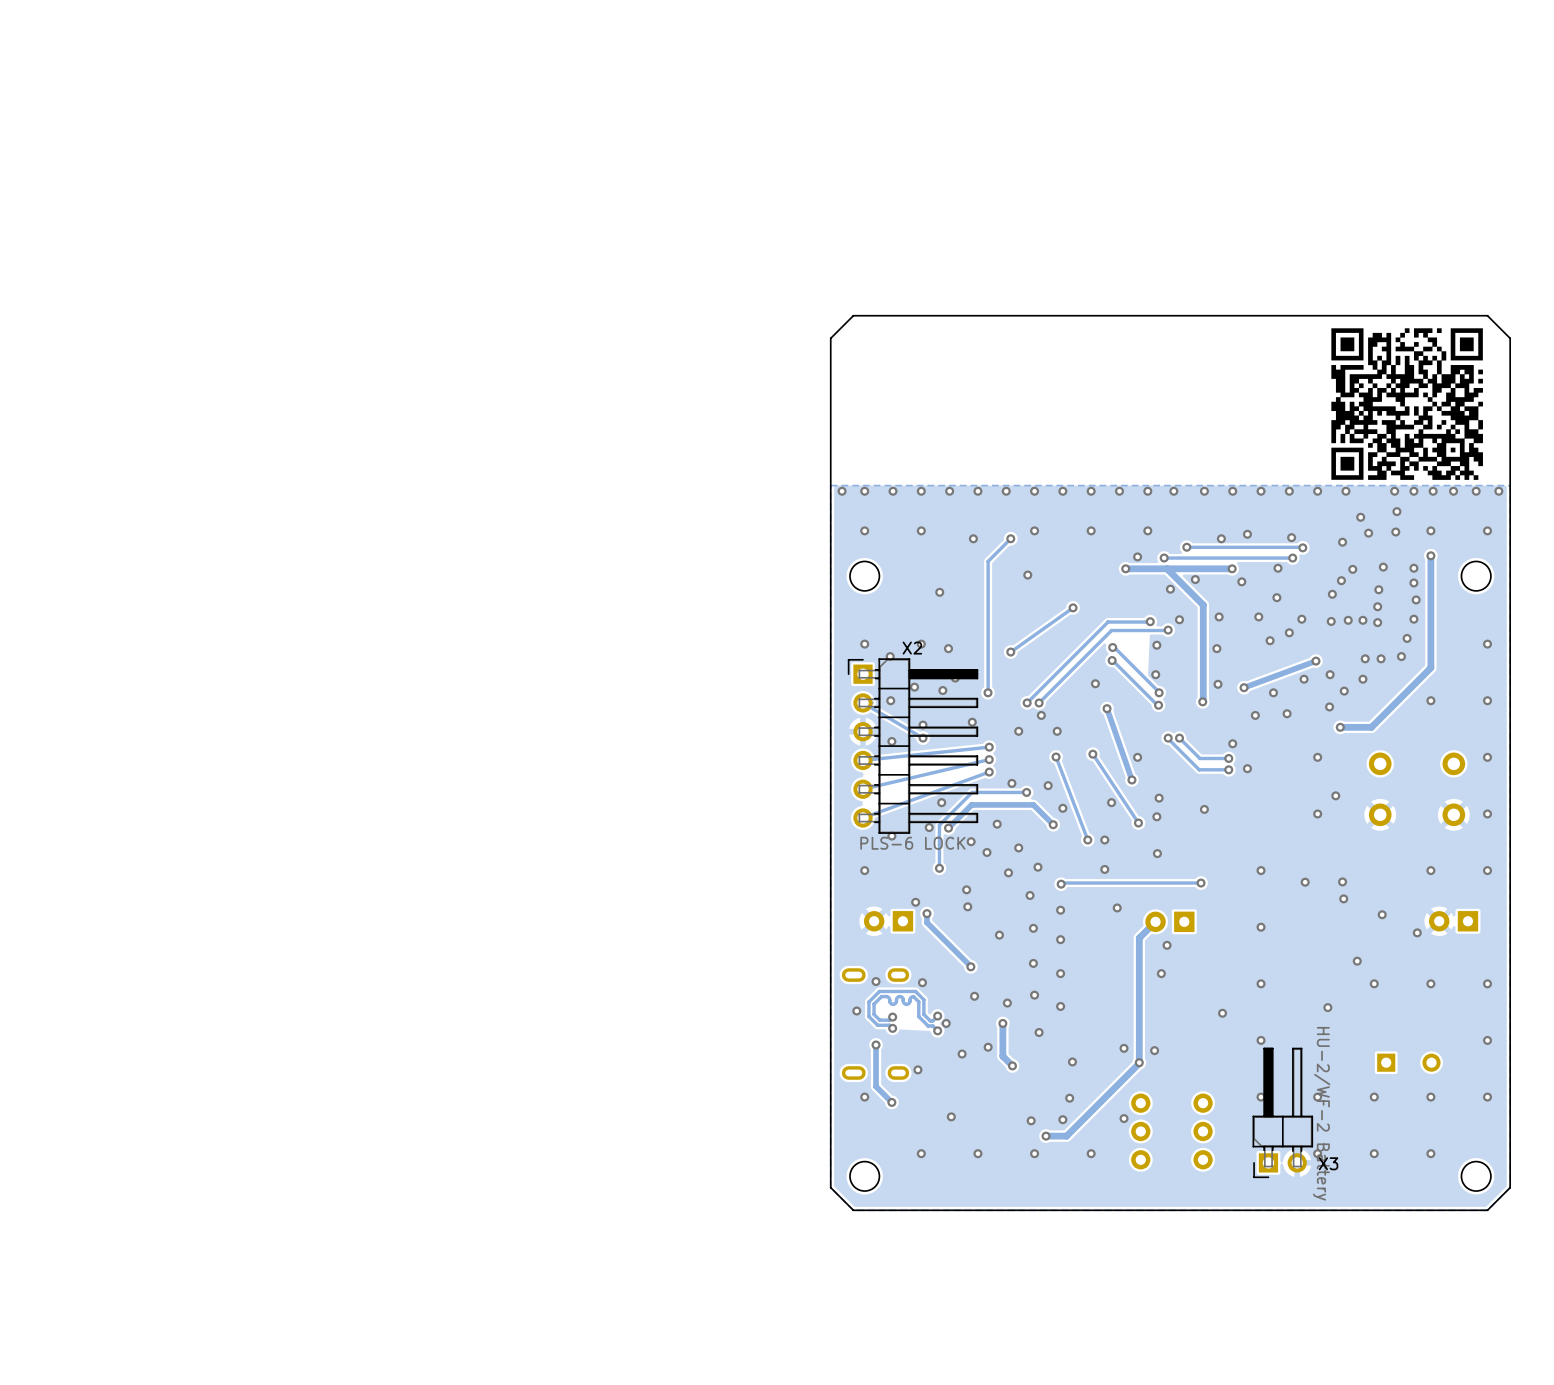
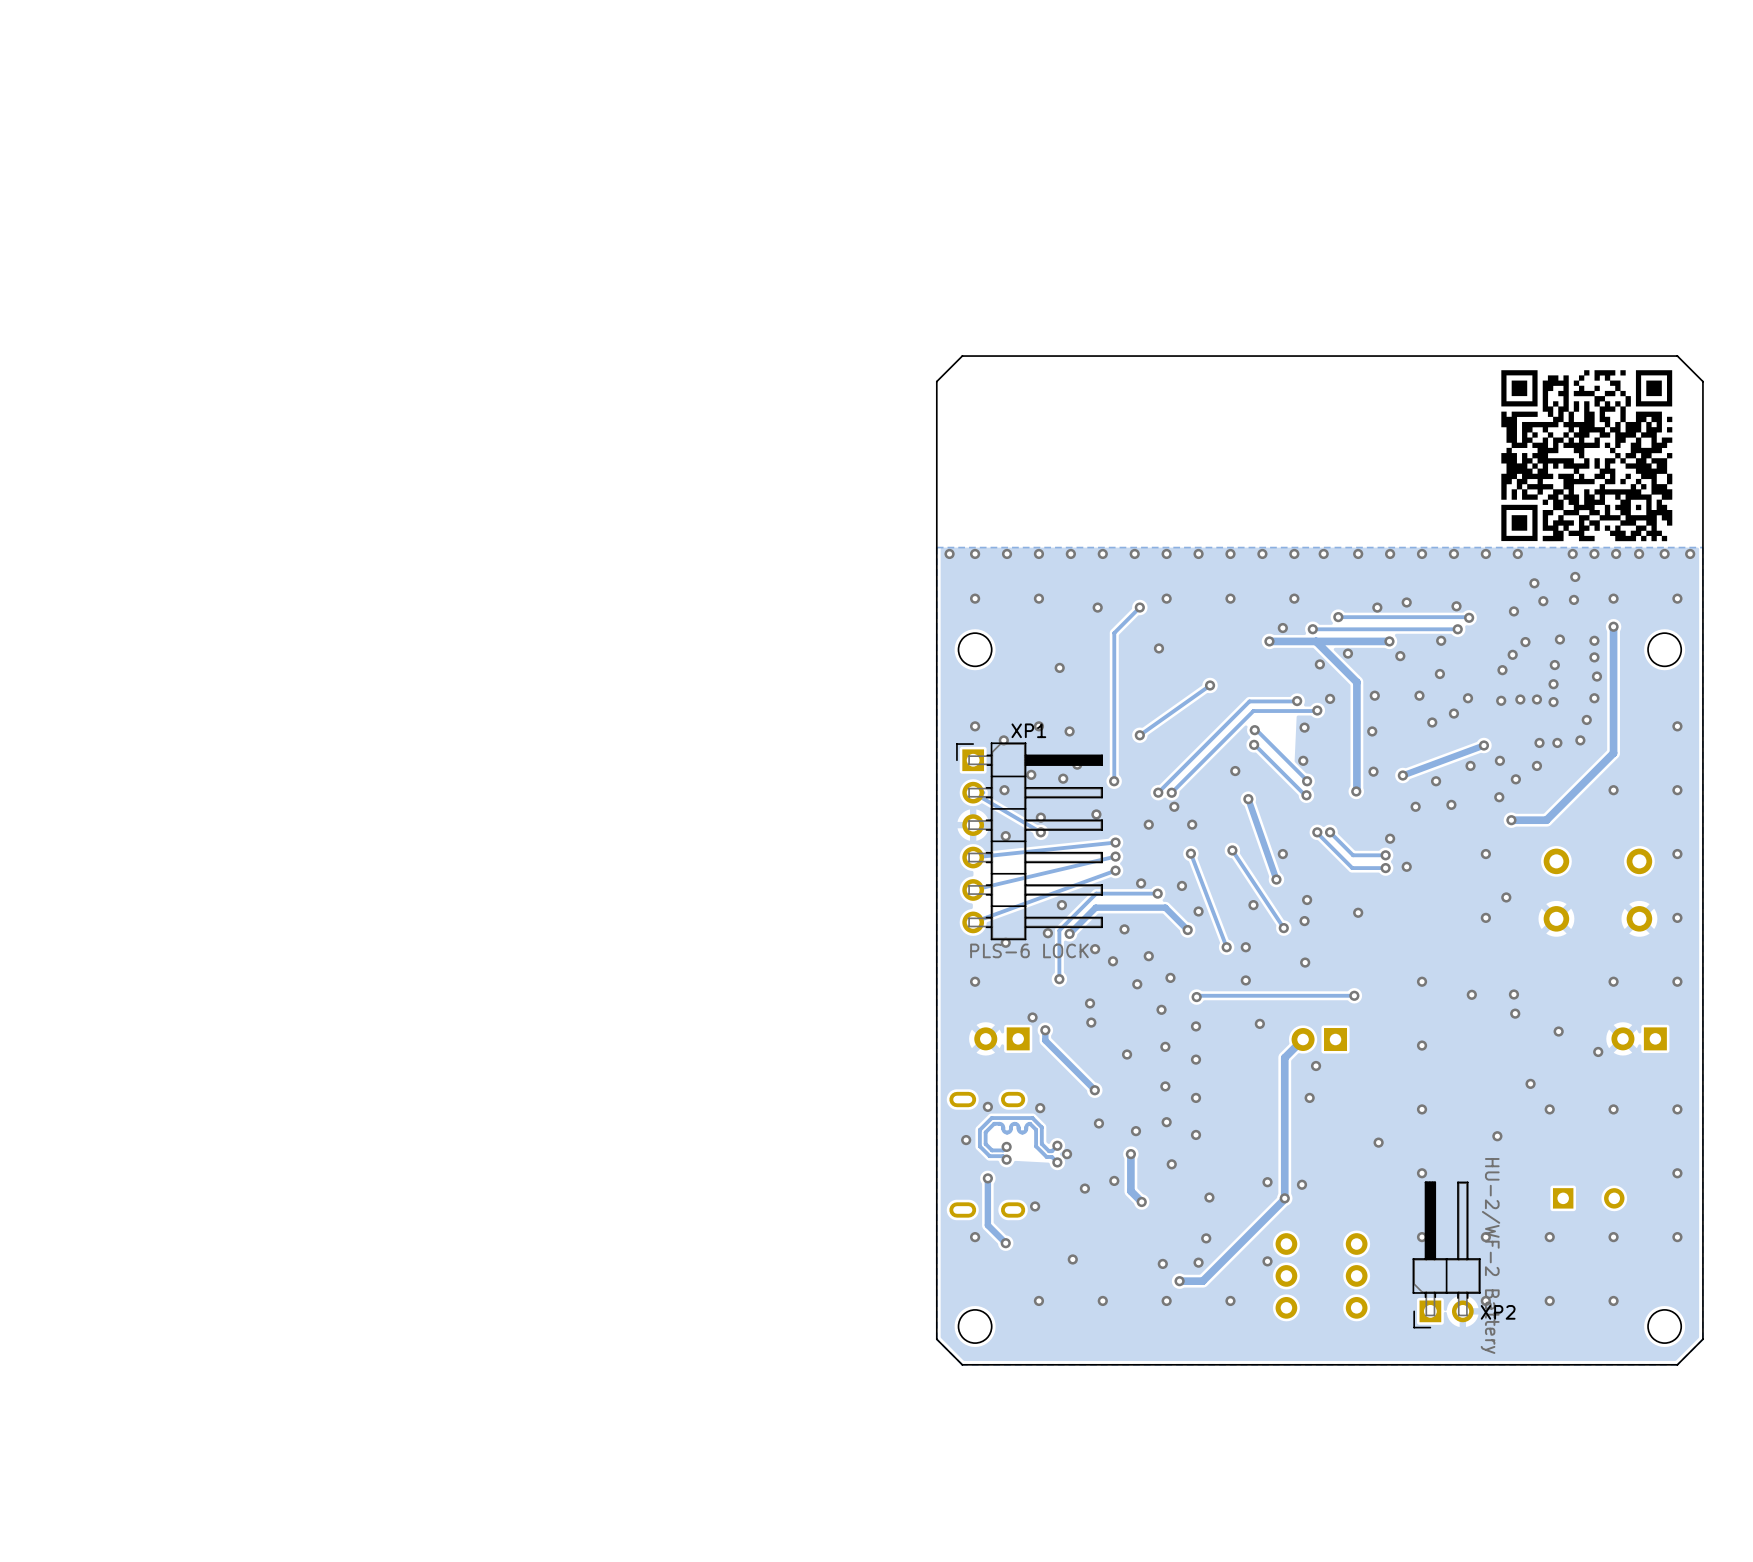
X2 name: X2 (912, 648) -> XP1 (1028, 730)
X3 name: X3 (1328, 1163) -> XP2 (1498, 1312)

